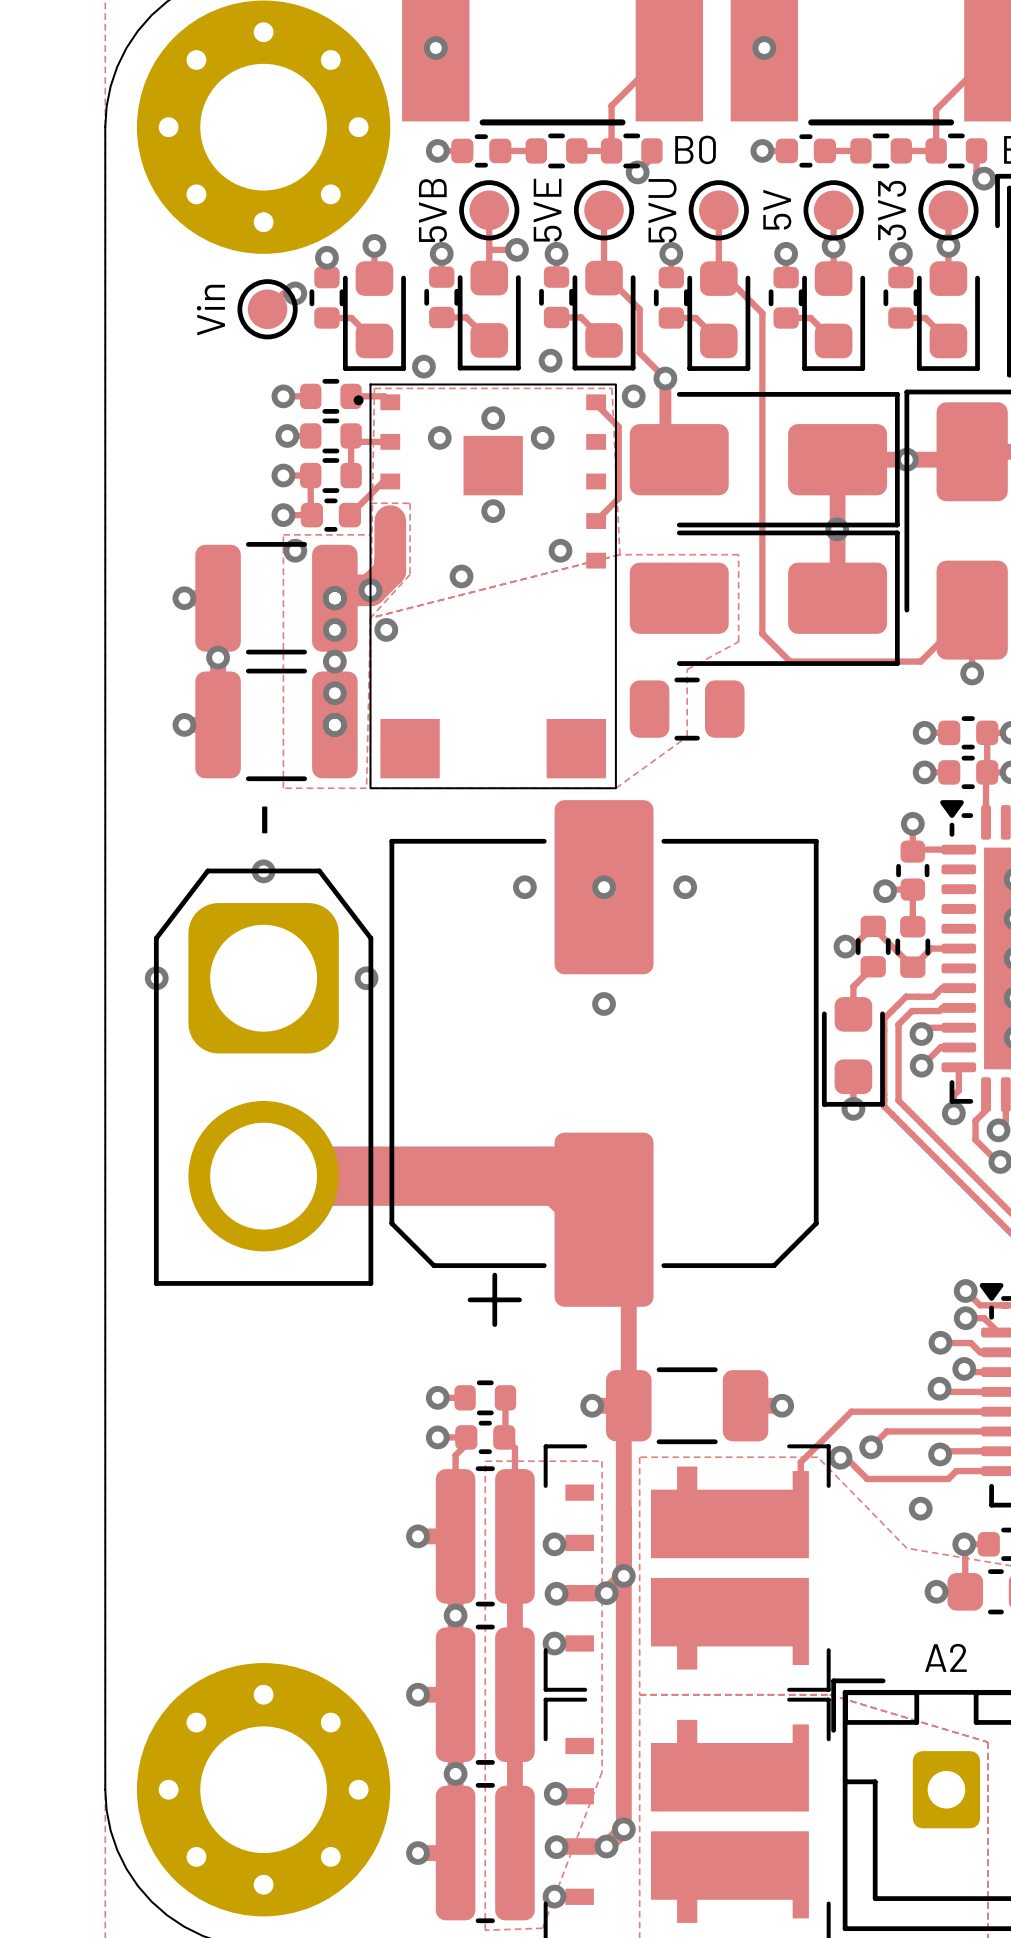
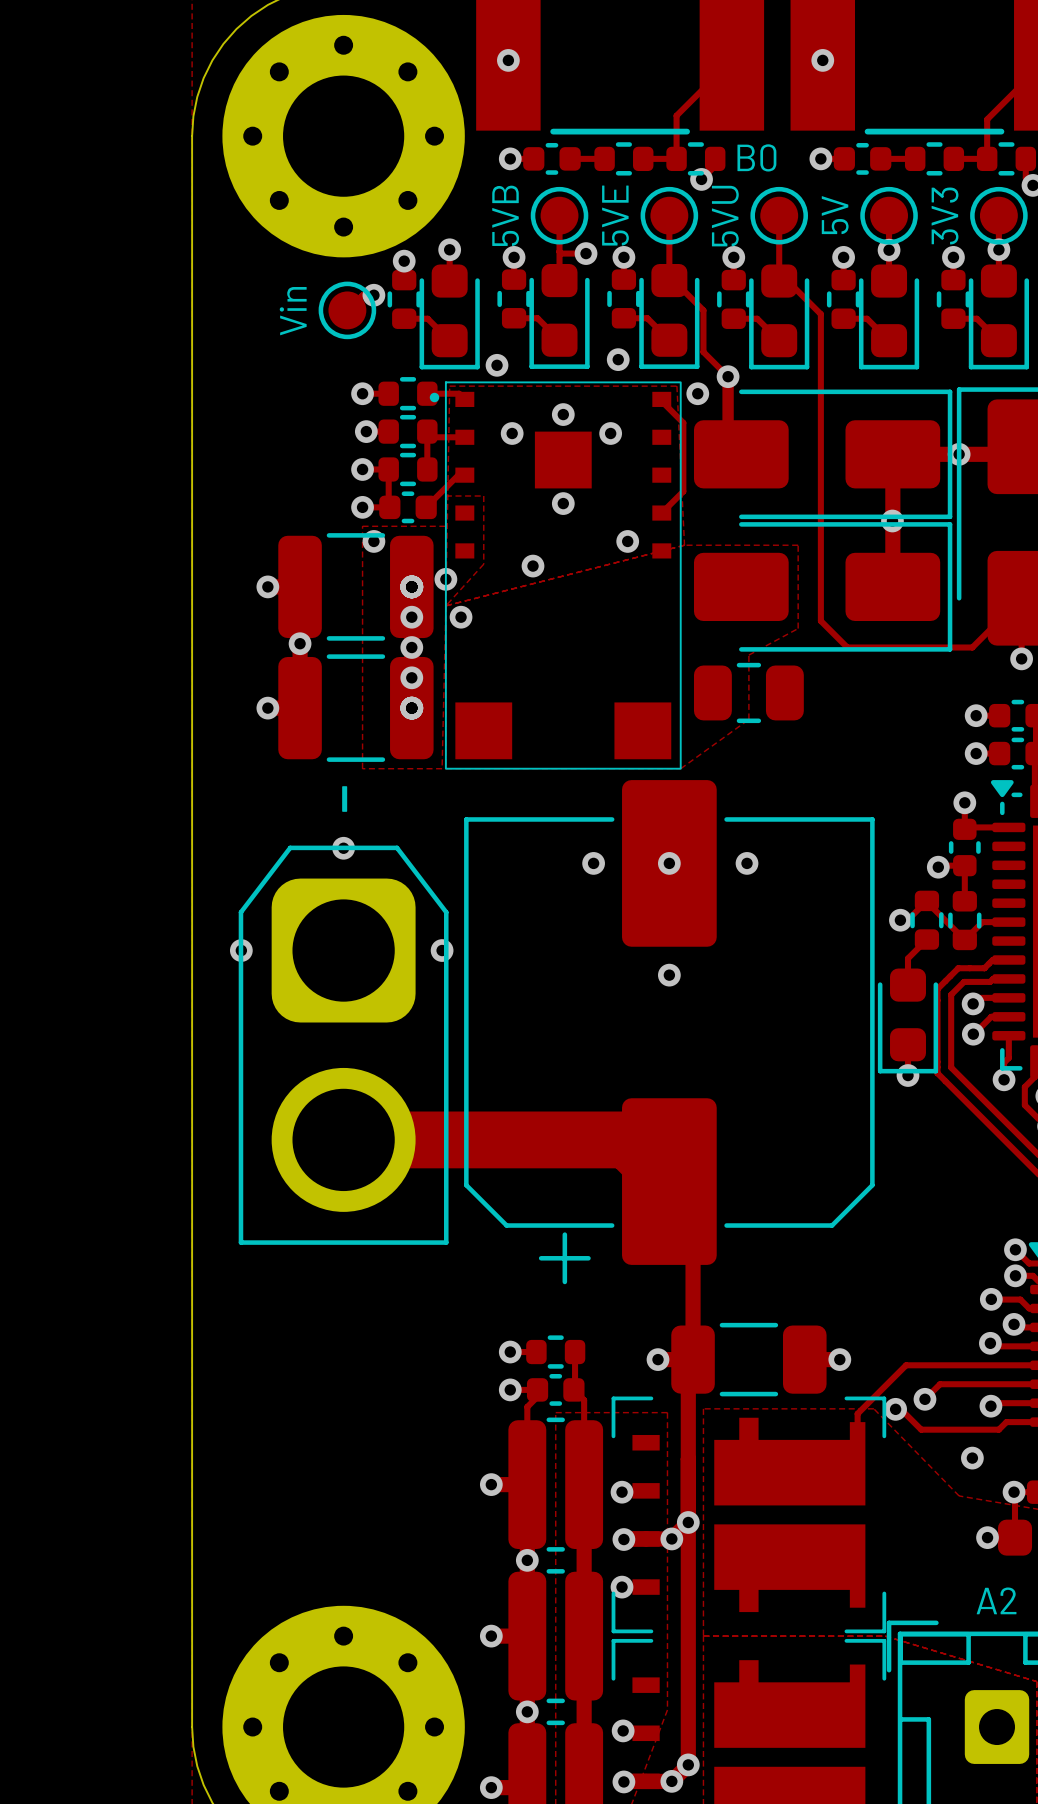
track: (390, 521) (390, 570) (370, 590) (342, 590) (334, 598) -> none

